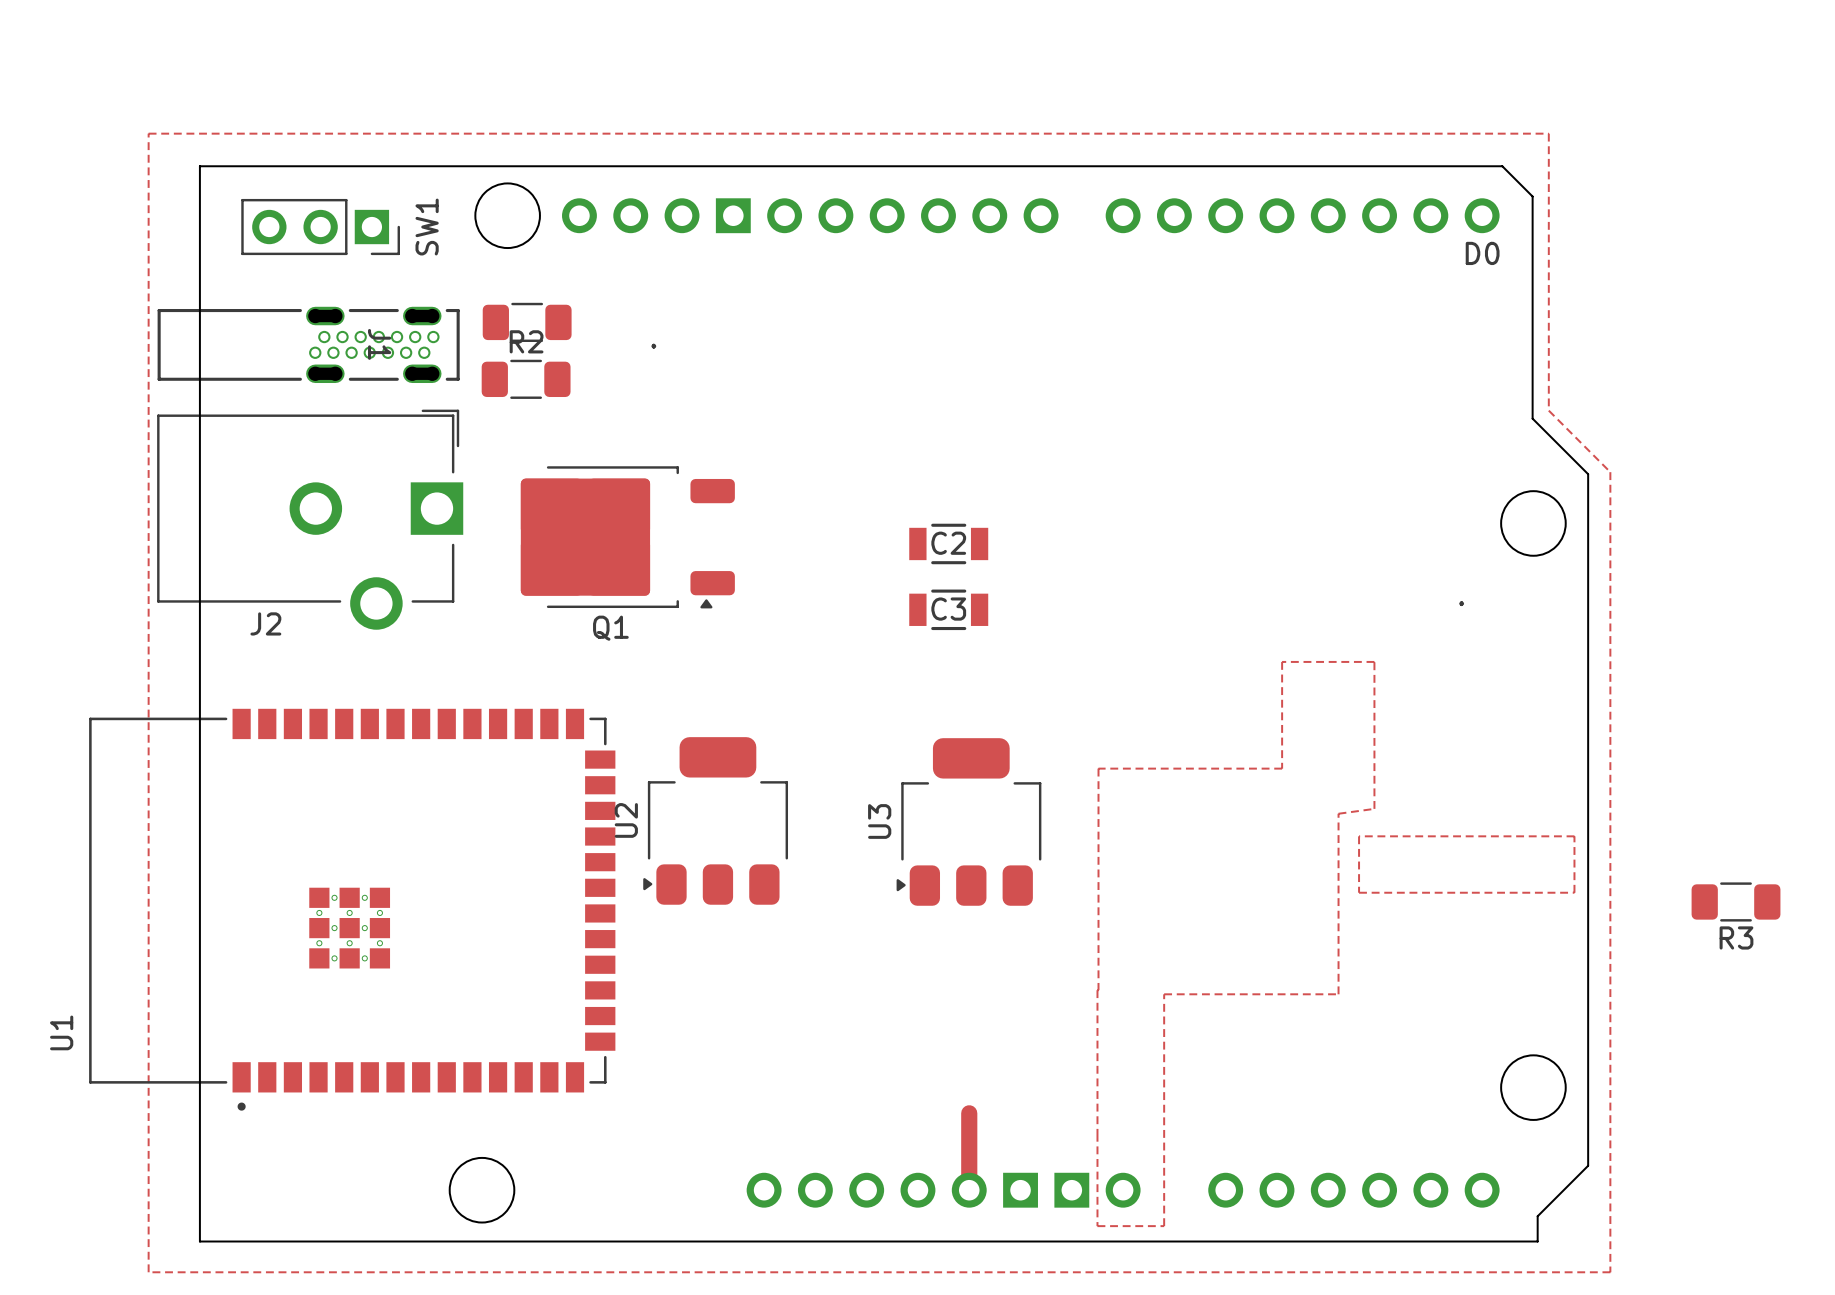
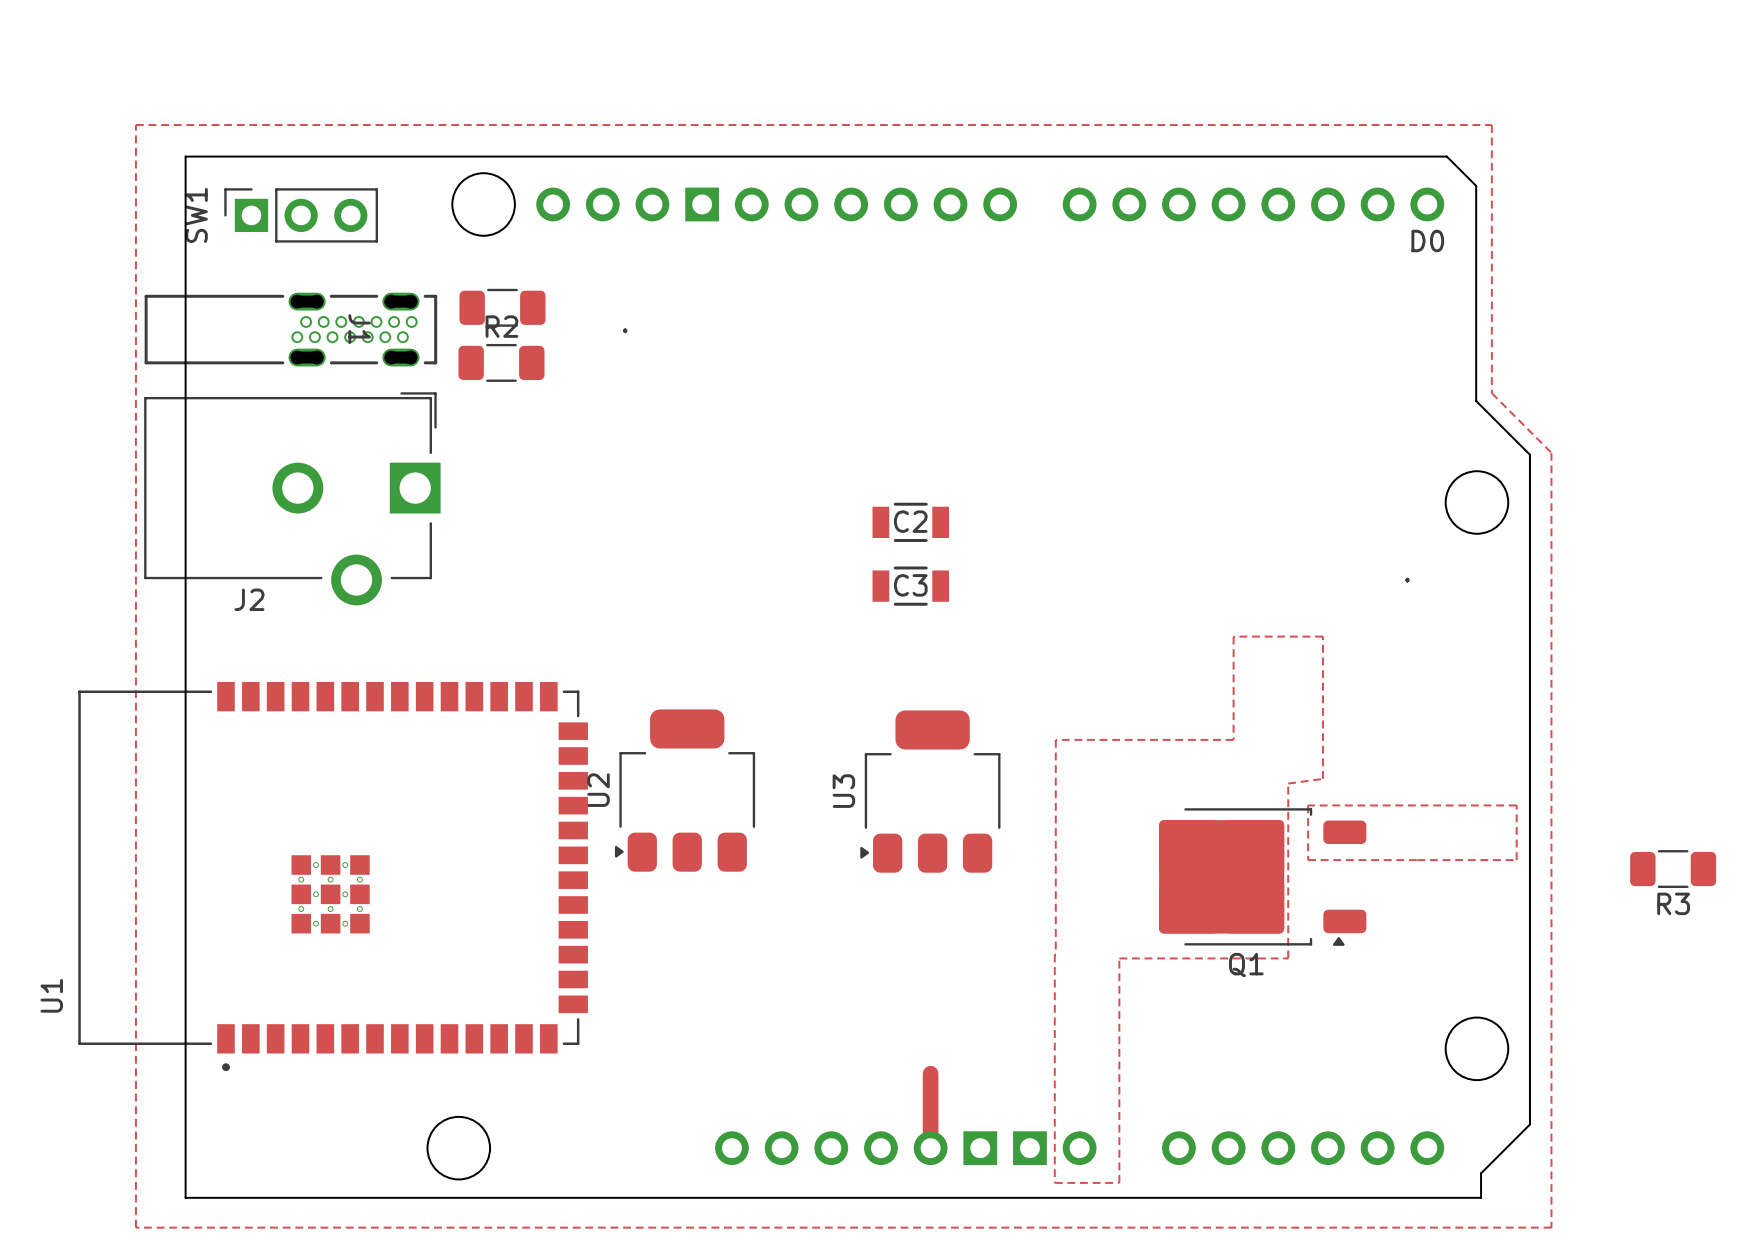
SW1 rotation: 0° (320, 227) -> 180° (301, 215)
Q1 position: (627, 537) -> (1262, 877)

